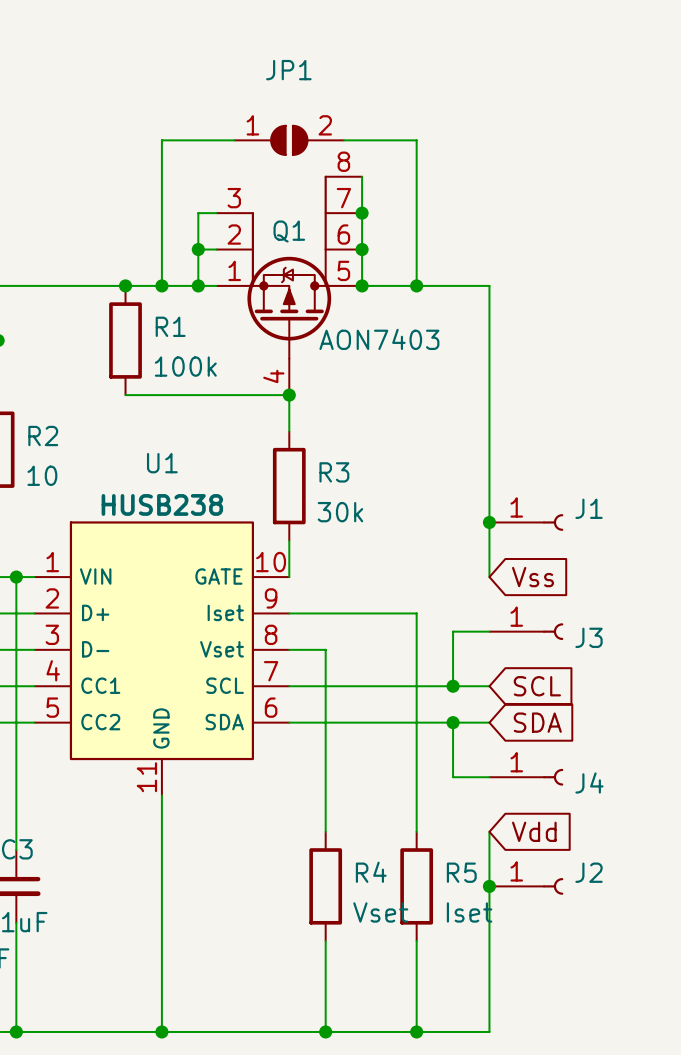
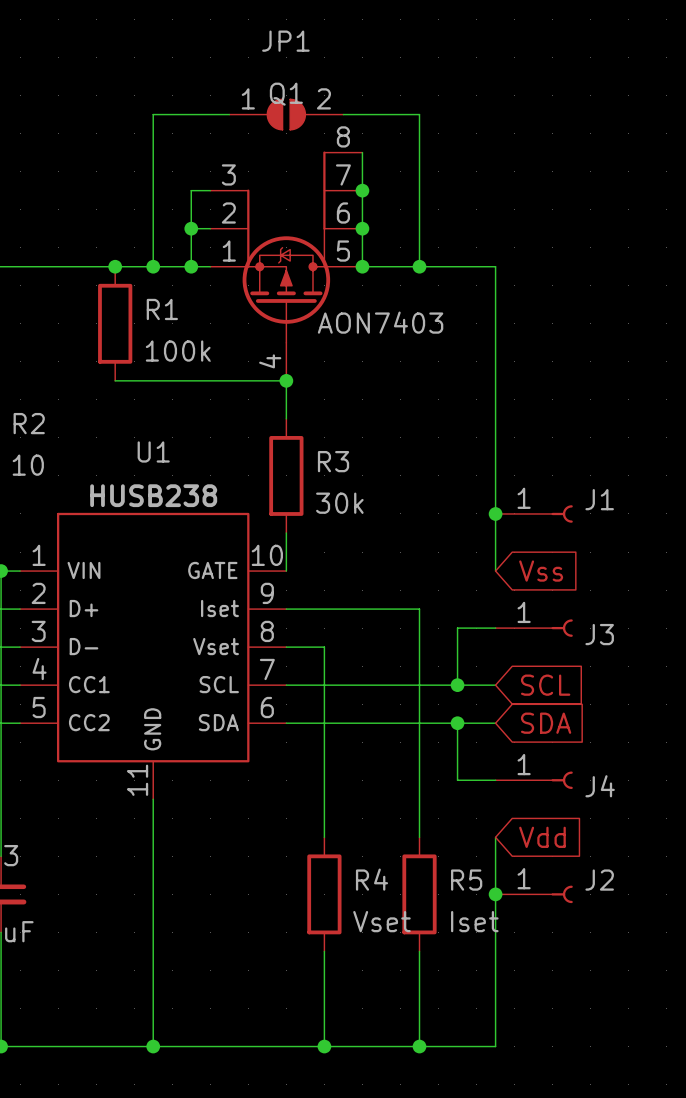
Q1 name position: Q1 (289, 231) -> Q1 (286, 94)

